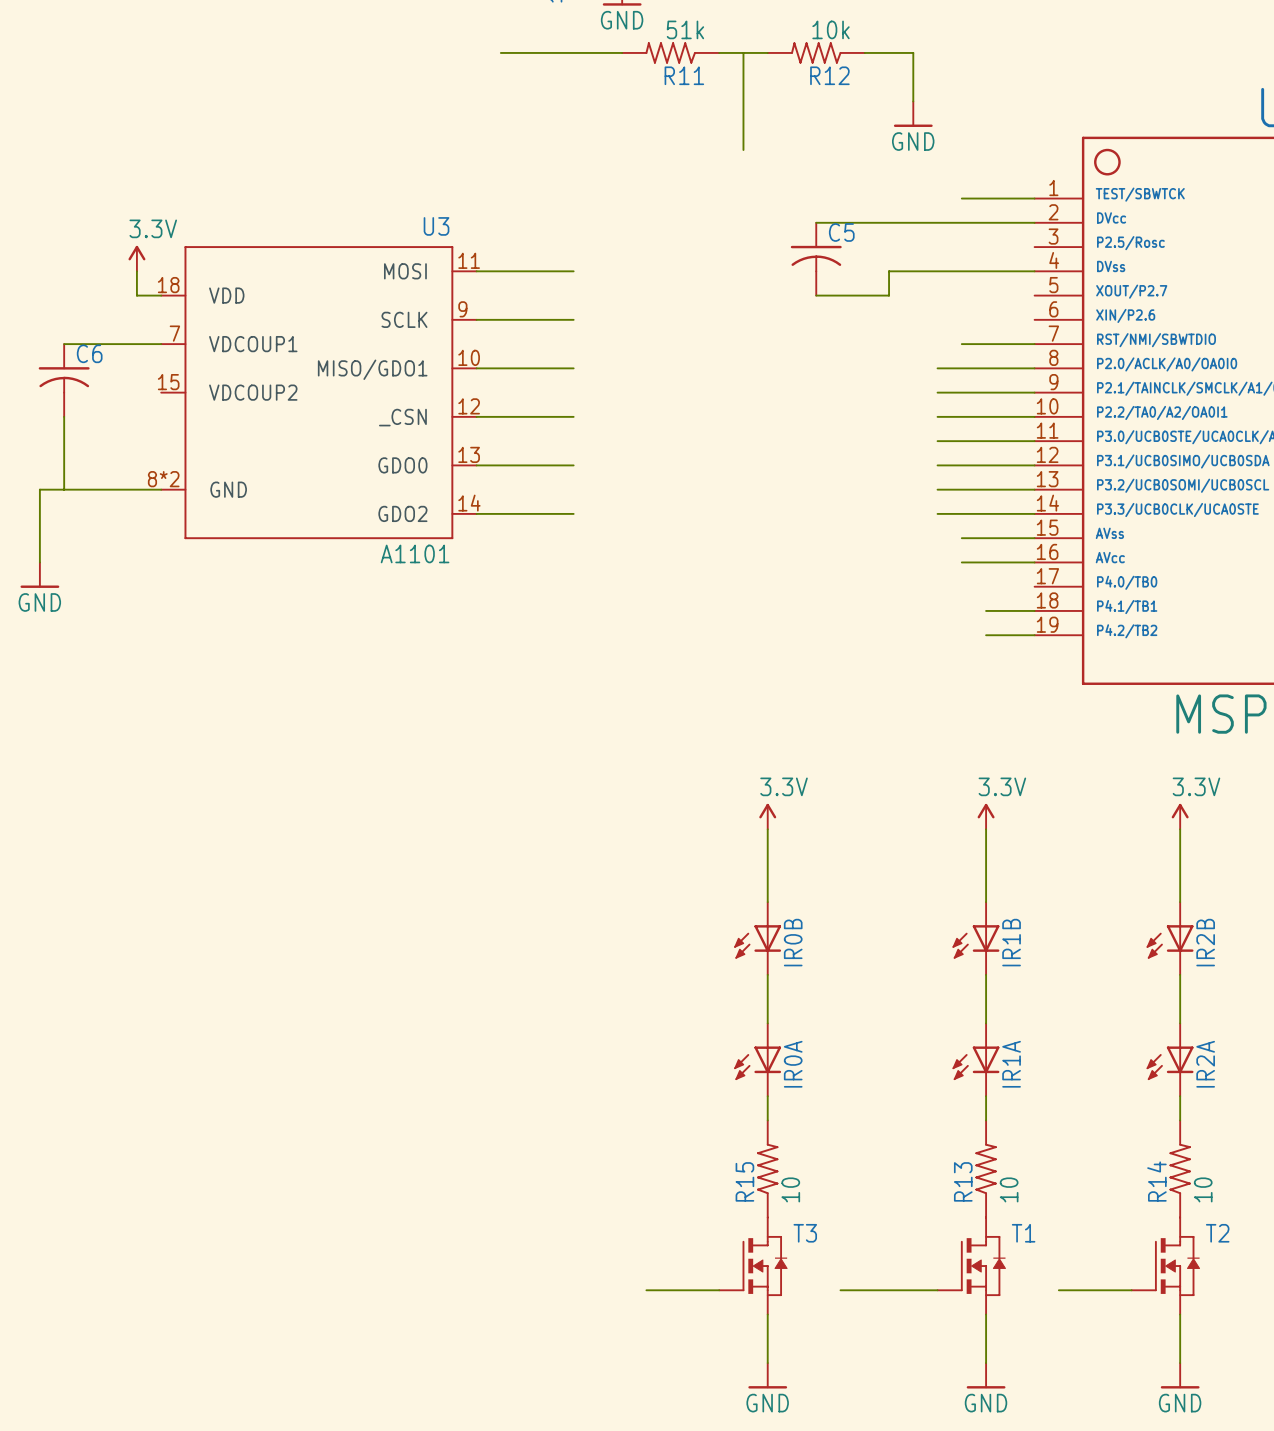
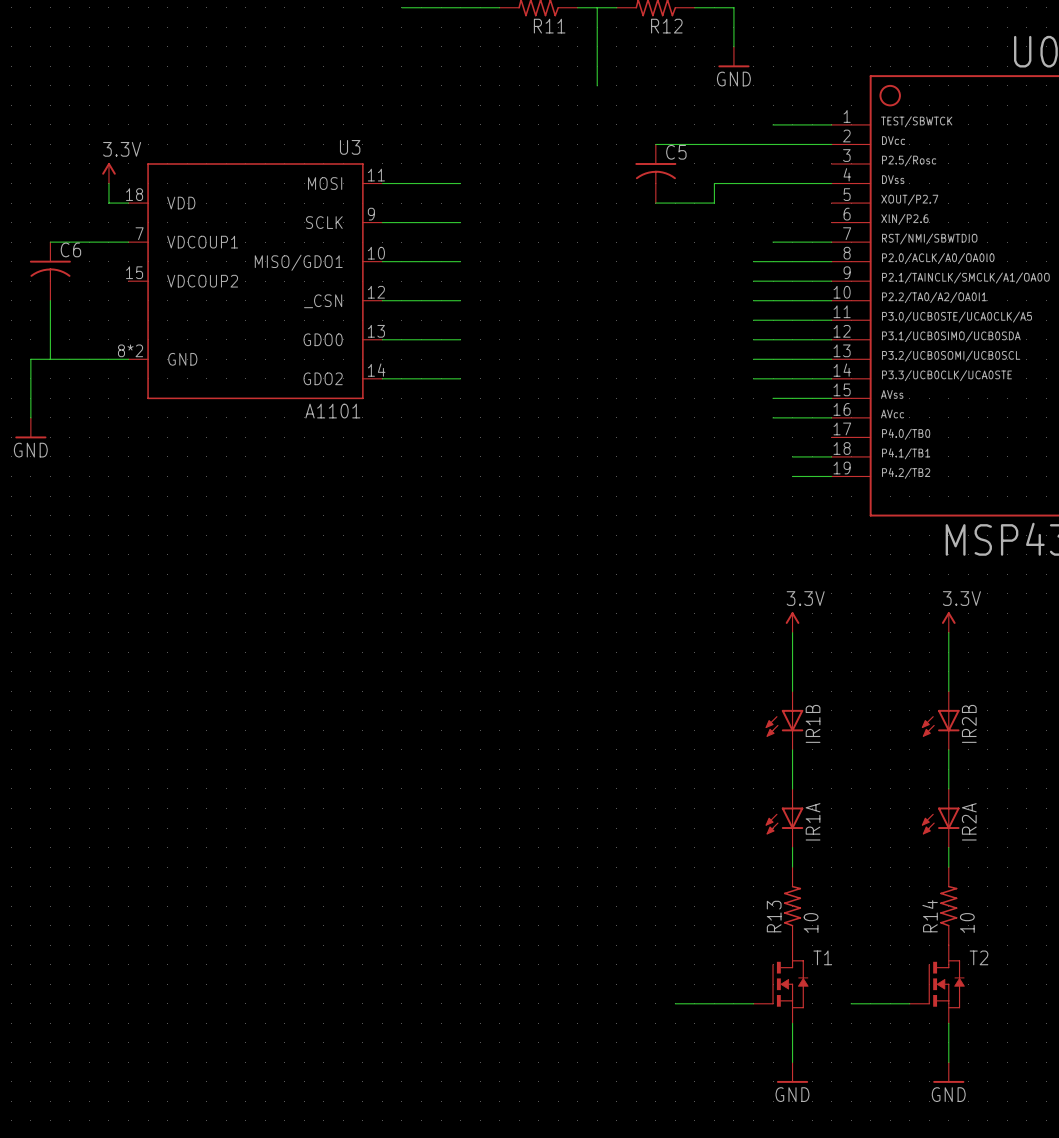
power symbol: 3.3V (767, 816) -> none
wire: (767, 829) (767, 902) -> none
IR0B: (757, 938) -> none
wire: (767, 974) (767, 1023) -> none
IR0A: (757, 1059) -> none
wire: (767, 1096) (767, 1120) -> none
R15: 10 (767, 1168) -> none
T3: (753, 1266) -> none
wire: (646, 1290) (719, 1290) -> none
wire: (767, 1314) (767, 1363) -> none
power symbol: GND (767, 1375) -> none

